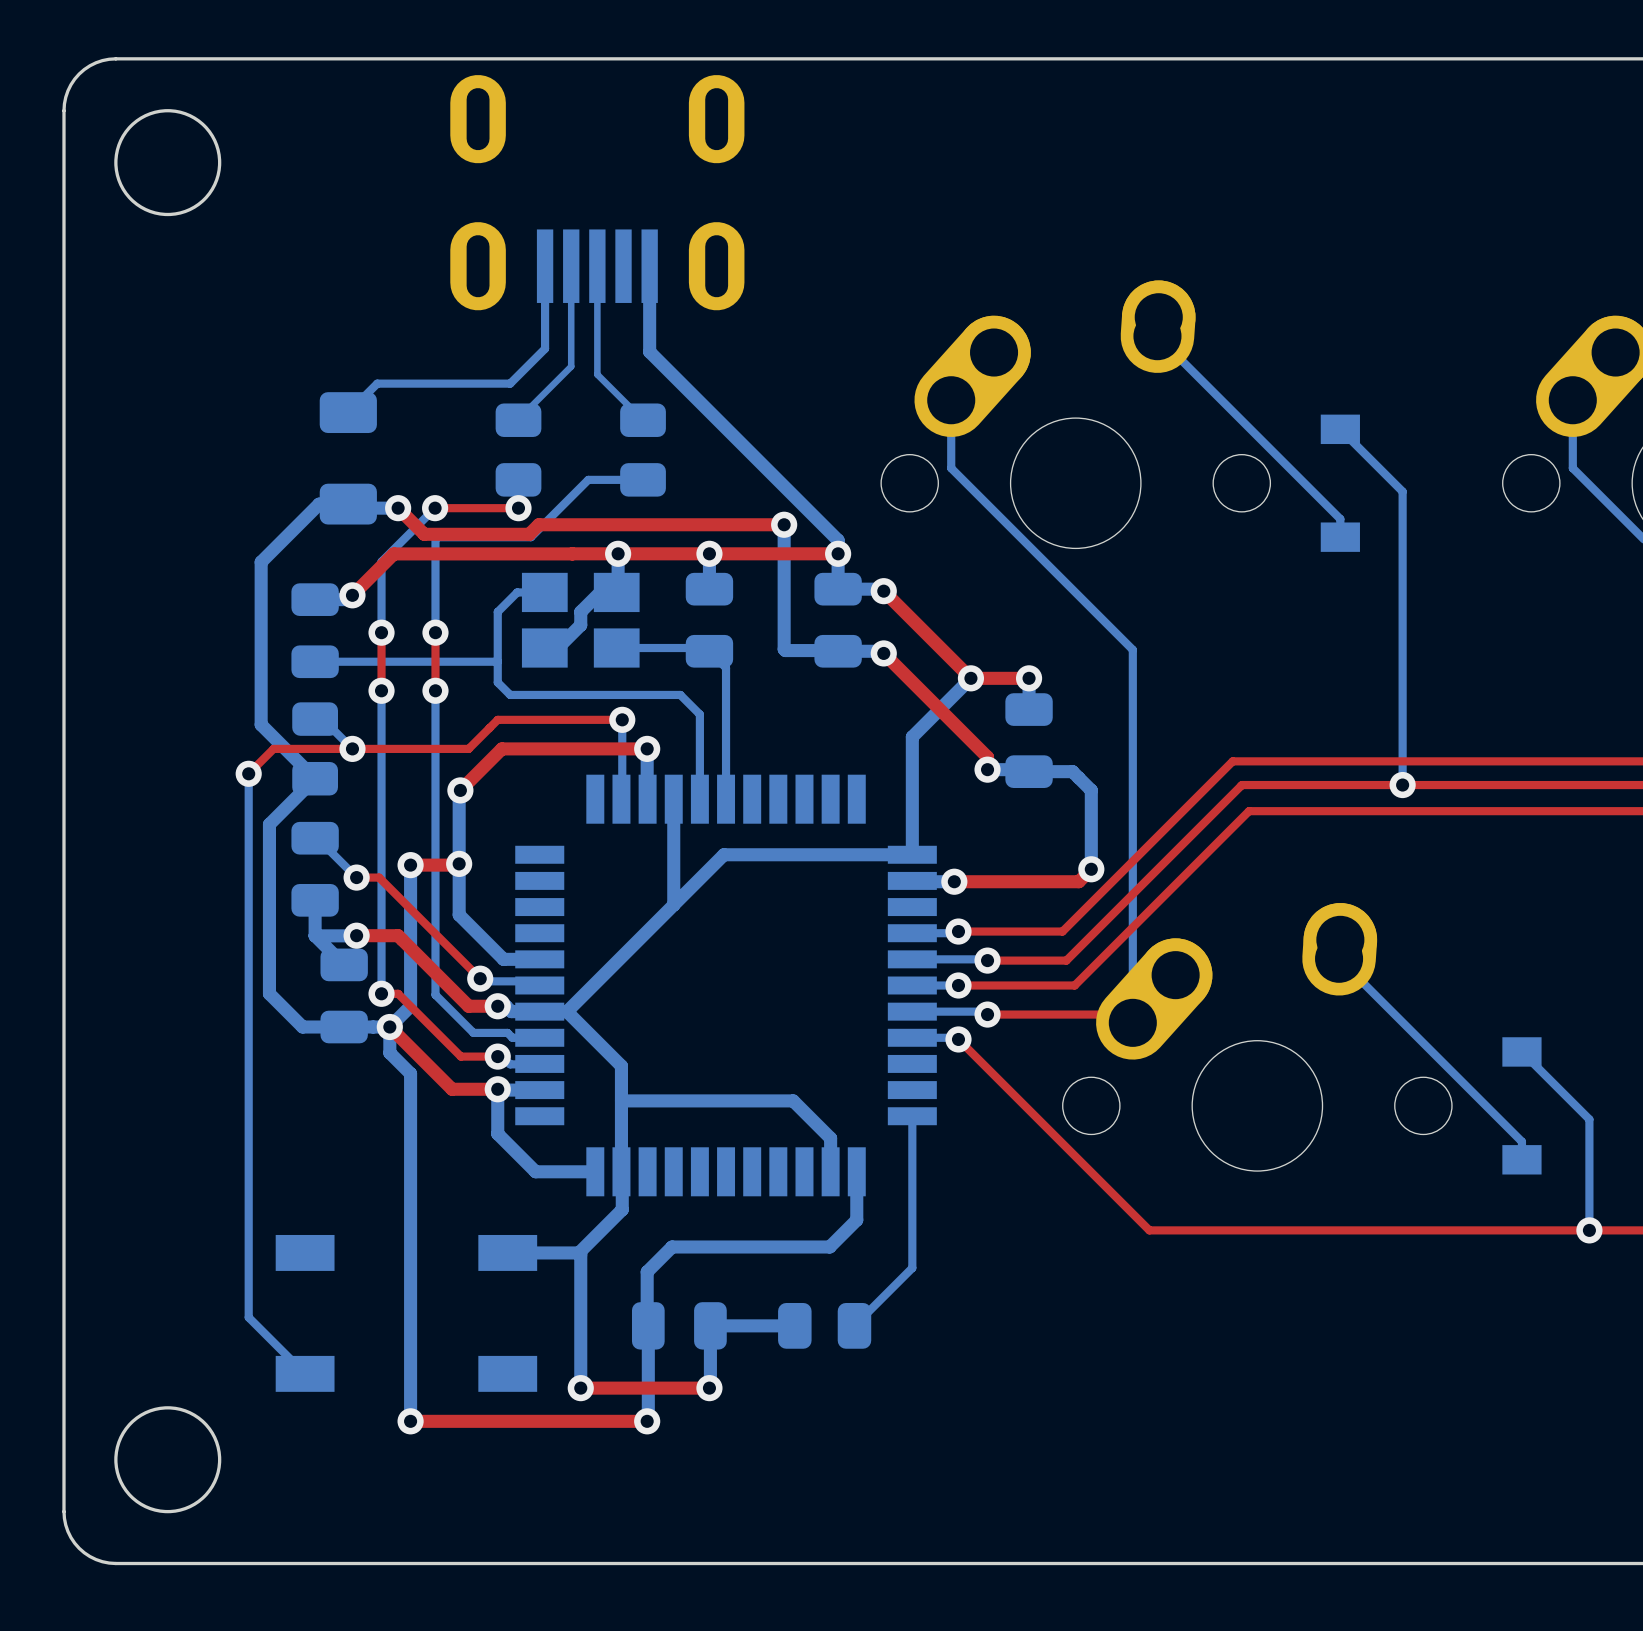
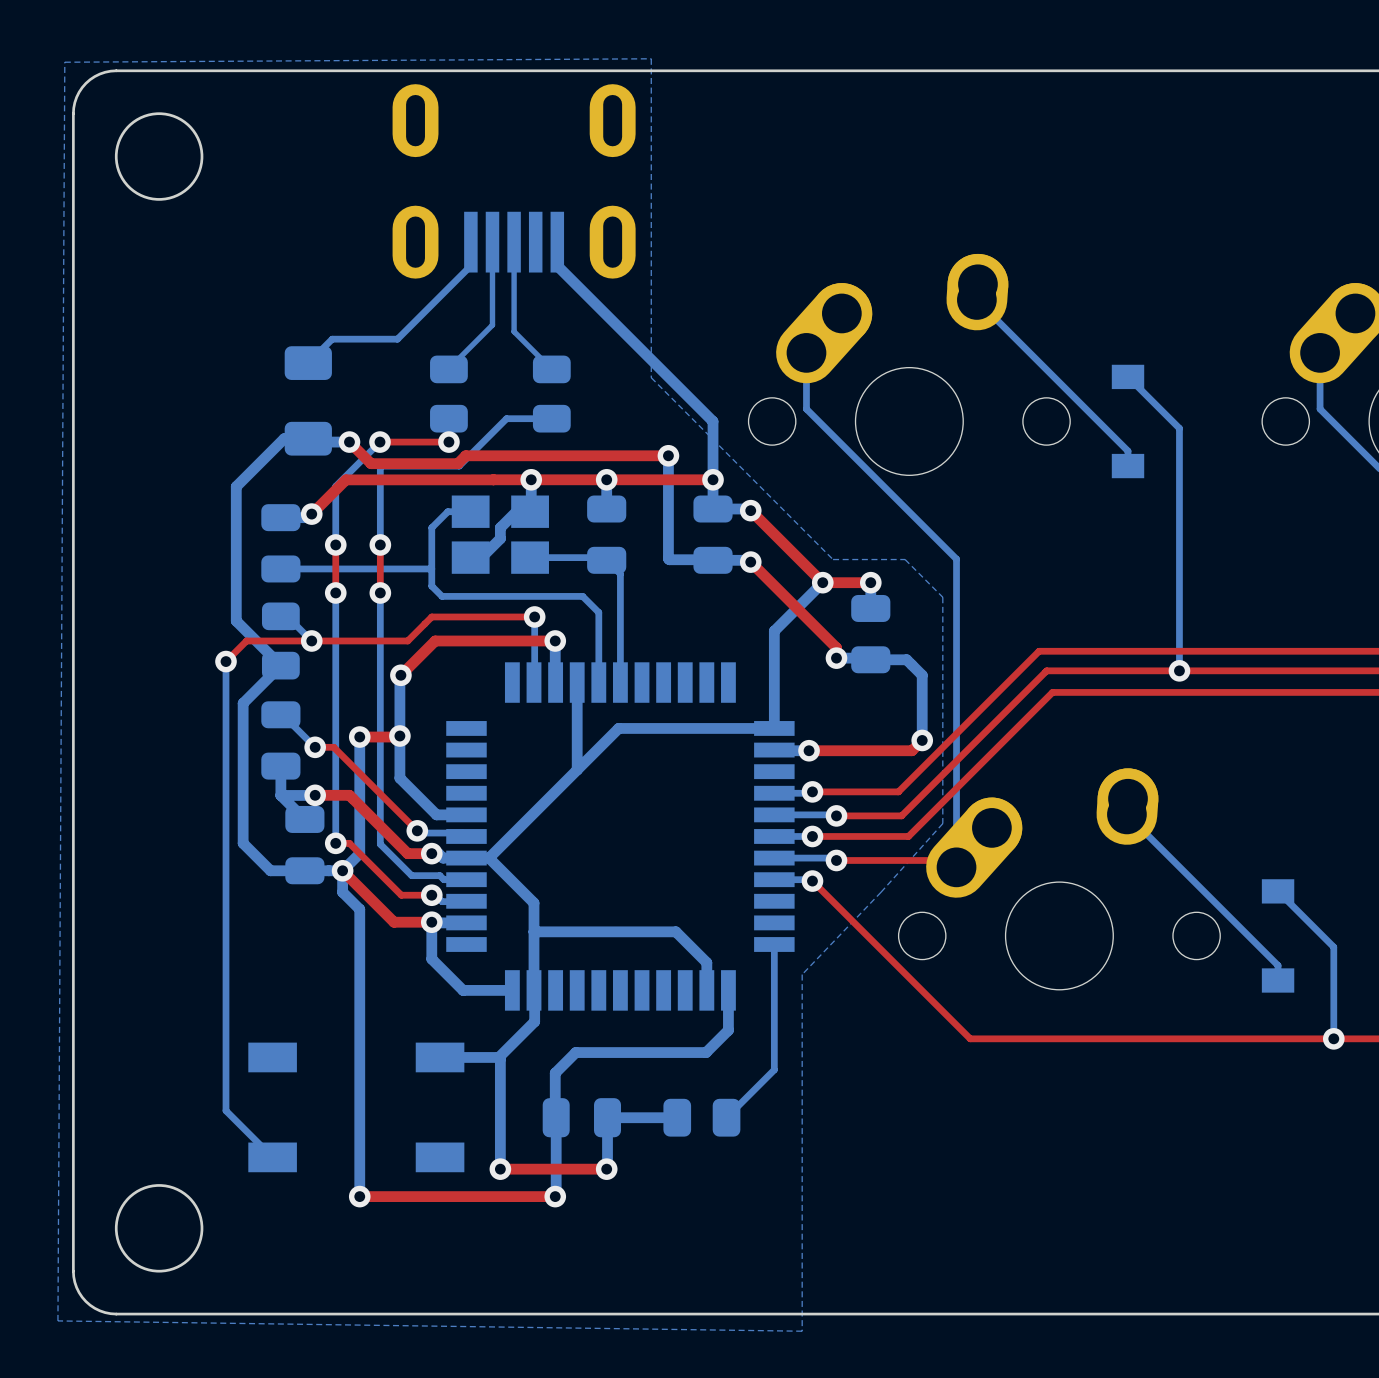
bottom zone outline: none -> (651, 58) (651, 377) (833, 559) (905, 559) (942, 597) (942, 823) (881, 892) (802, 974) (802, 1331) (57, 1320) (64, 62) (651, 58)
bottom track: (545, 294) (545, 348) (510, 383) (456, 383) -> (470, 265) (397, 339)
bottom track: (649, 294) (649, 351) (838, 540) -> (557, 265) (713, 421) (713, 468)

